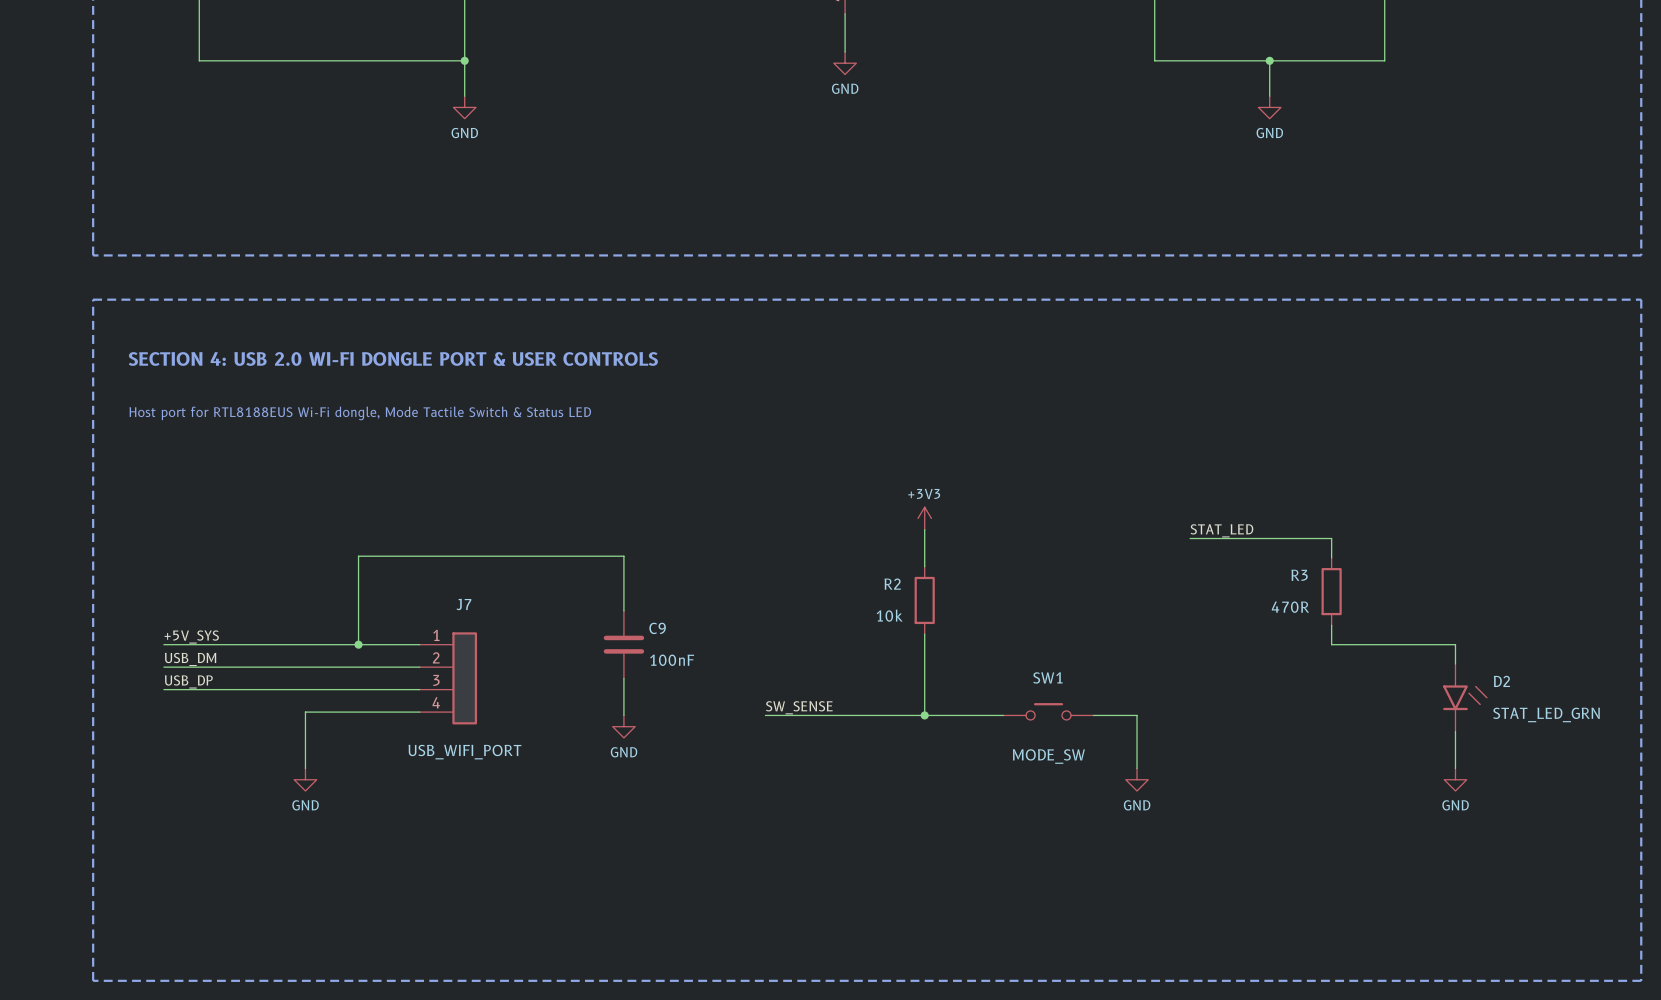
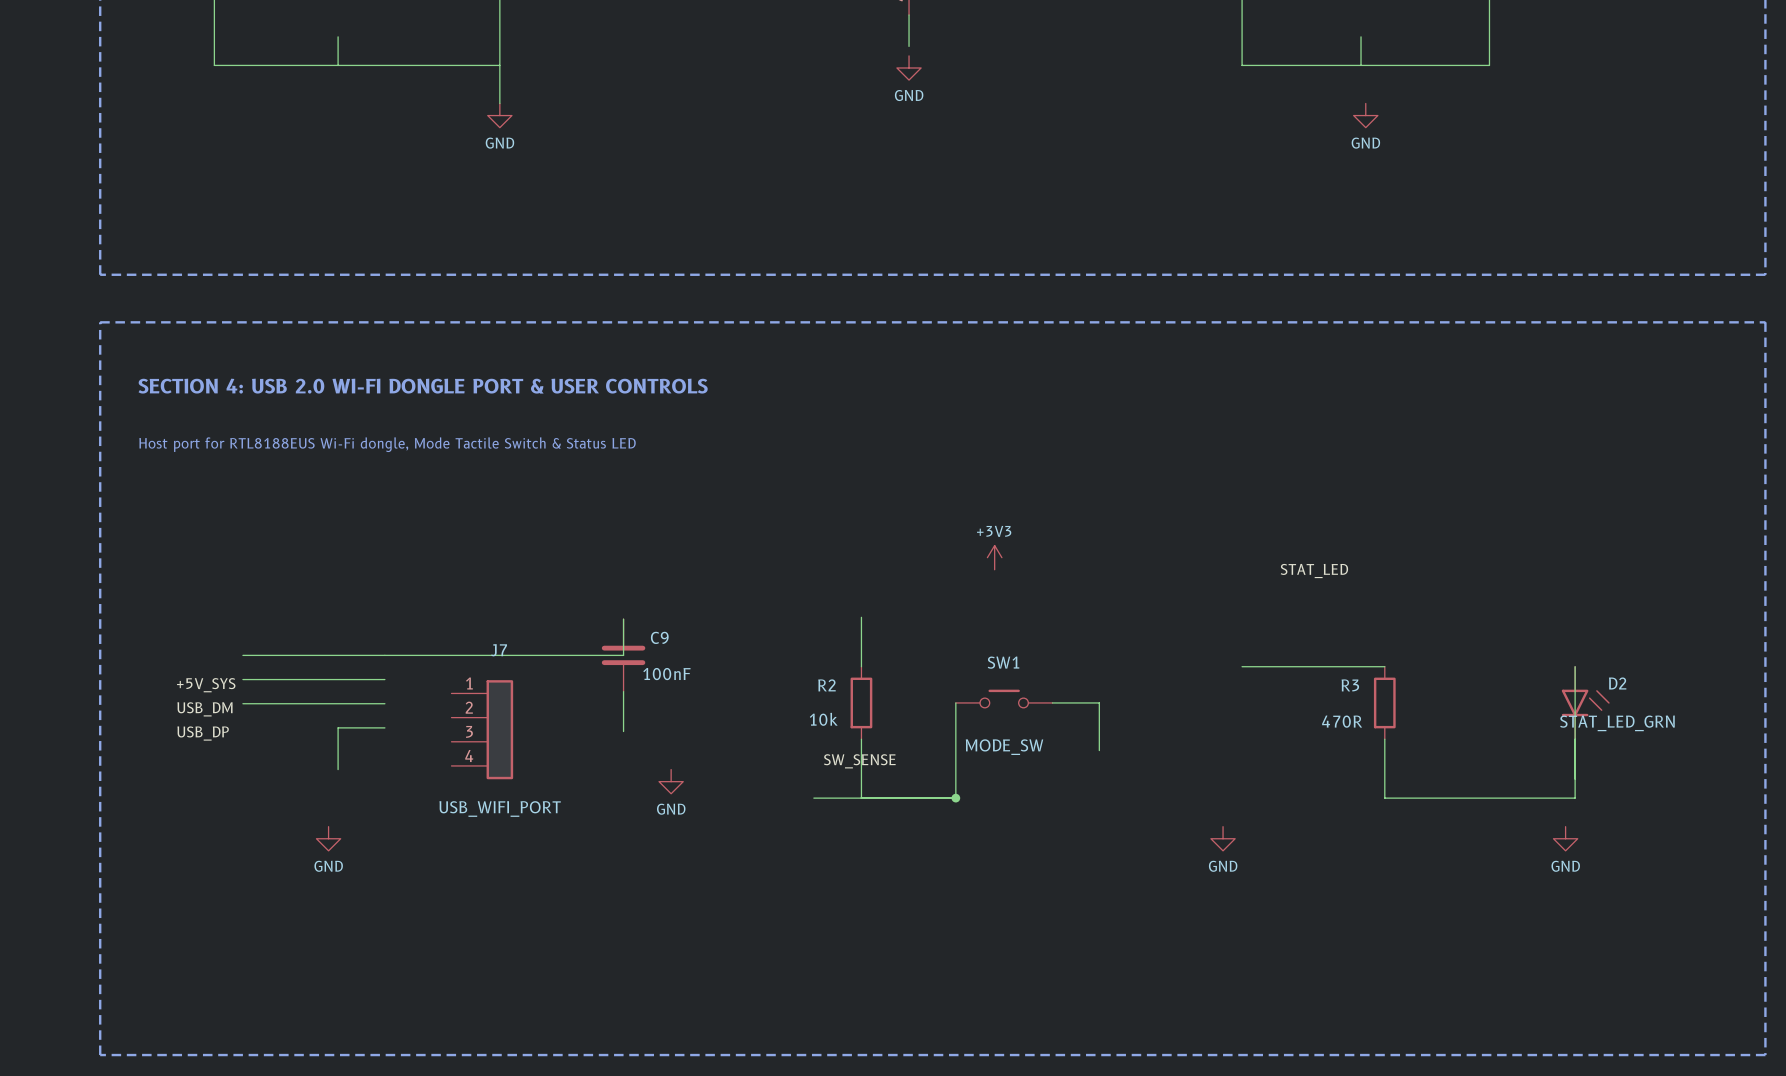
wire: none -> (338, 36) (338, 65)
wire: none -> (1361, 36) (1361, 65)
wire: (845, 43) (845, 51) -> none
junction: (464, 60) -> none
wire: (1269, 60) (1269, 96) -> none
junction: (1269, 60) -> none
wire: (924, 529) (924, 566) -> none
wire: (1190, 538) (1331, 538) (1331, 557) -> none
wire: none -> (861, 617) (861, 666)
wire: none -> (623, 619) (623, 655) (242, 655)
R3 position: (1331, 591) -> (1384, 702)
R2 position: (924, 600) -> (861, 702)
R3 value position: 470R (1290, 607) -> 470R (1342, 721)
wire: (623, 610) (623, 556) (358, 556) (358, 644) -> none
wire: none -> (1242, 666) (1384, 666)
wire: none -> (1575, 666) (1575, 798) (1384, 798) (1384, 739)
wire: (1331, 625) (1331, 644) (1455, 644) (1455, 664) -> none
wire: none -> (242, 679) (384, 679)
wire: (924, 634) (924, 715) -> none
wire: (163, 644) (419, 644) -> none
junction: (358, 644) -> none
C9 position: (623, 644) -> (623, 655)
wire: none -> (955, 702) (955, 798) (813, 798)
wire: none -> (1052, 702) (1099, 702) (1099, 750)
wire: none -> (242, 703) (384, 703)
C9 value position: 100nF (672, 660) -> 100nF (666, 674)
wire: (163, 667) (419, 667) -> none
wire: none -> (384, 727) (338, 727) (338, 769)
wire: (623, 678) (623, 715) -> (623, 691) (623, 731)
D2 name position: D2 (1501, 681) -> D2 (1617, 683)
wire: none -> (861, 739) (861, 798)
wire: (163, 689) (419, 689) -> none
D2 position: (1465, 697) -> (1585, 702)
SW1 position: (1048, 711) -> (1004, 698)
wire: (419, 712) (305, 712) (305, 768) -> none
D2 value position: STAT_LED_GRN (1546, 714) -> STAT_LED_GRN (1617, 723)
wire: (765, 715) (1003, 715) -> none
junction position: (924, 715) -> (955, 798)
wire: (1093, 715) (1137, 715) (1137, 768) -> none
wire: (1455, 731) (1455, 768) -> none

